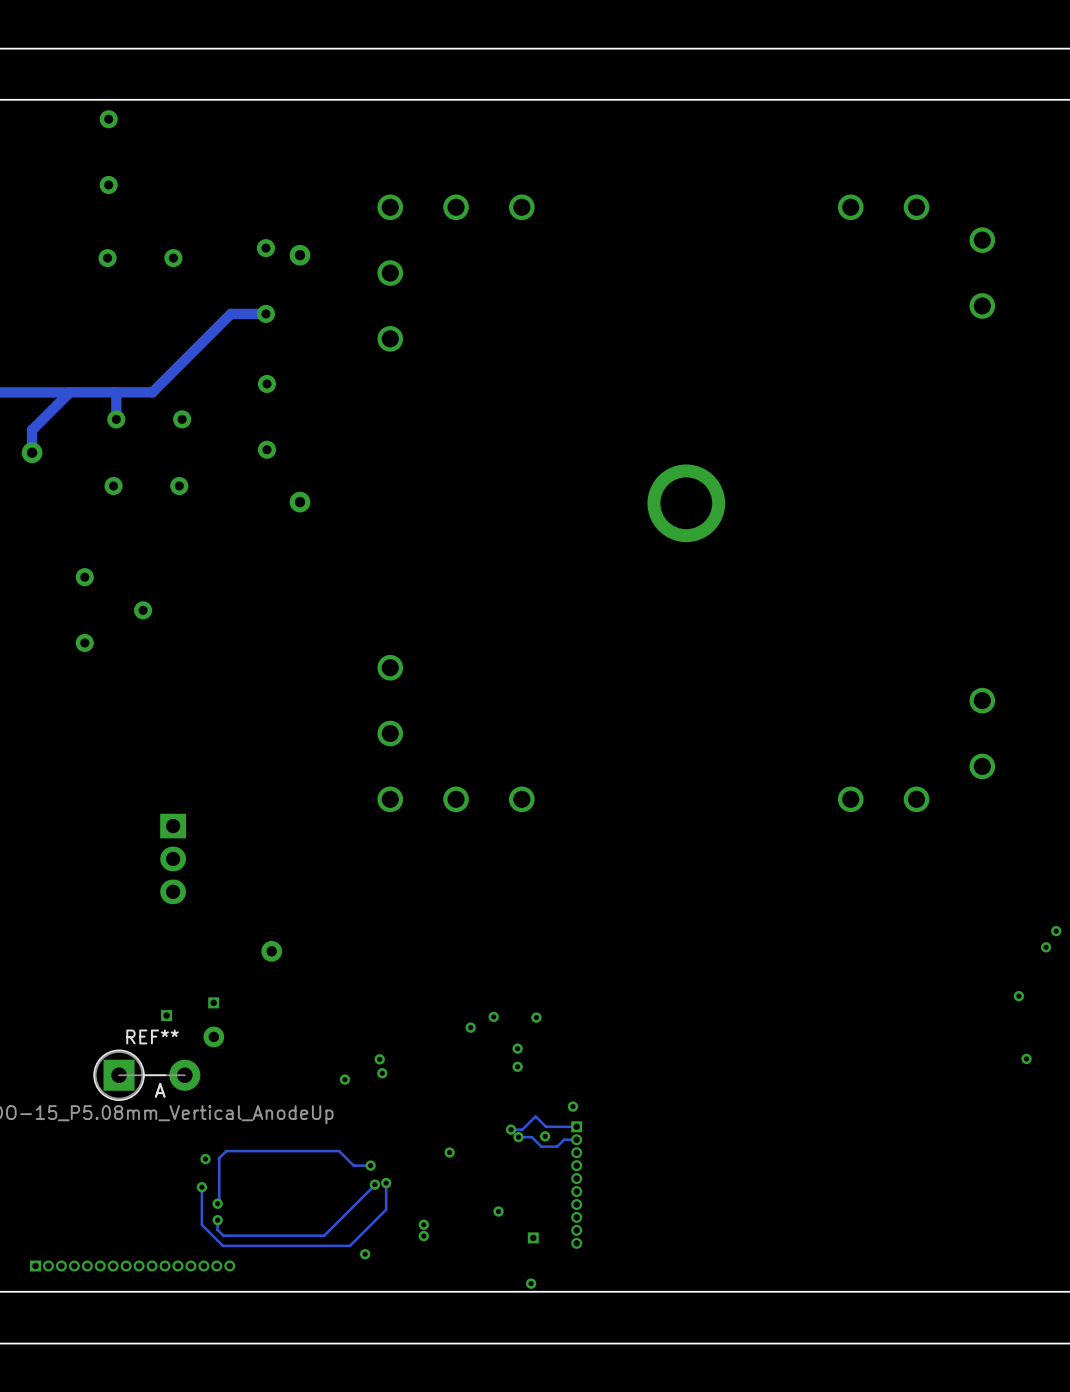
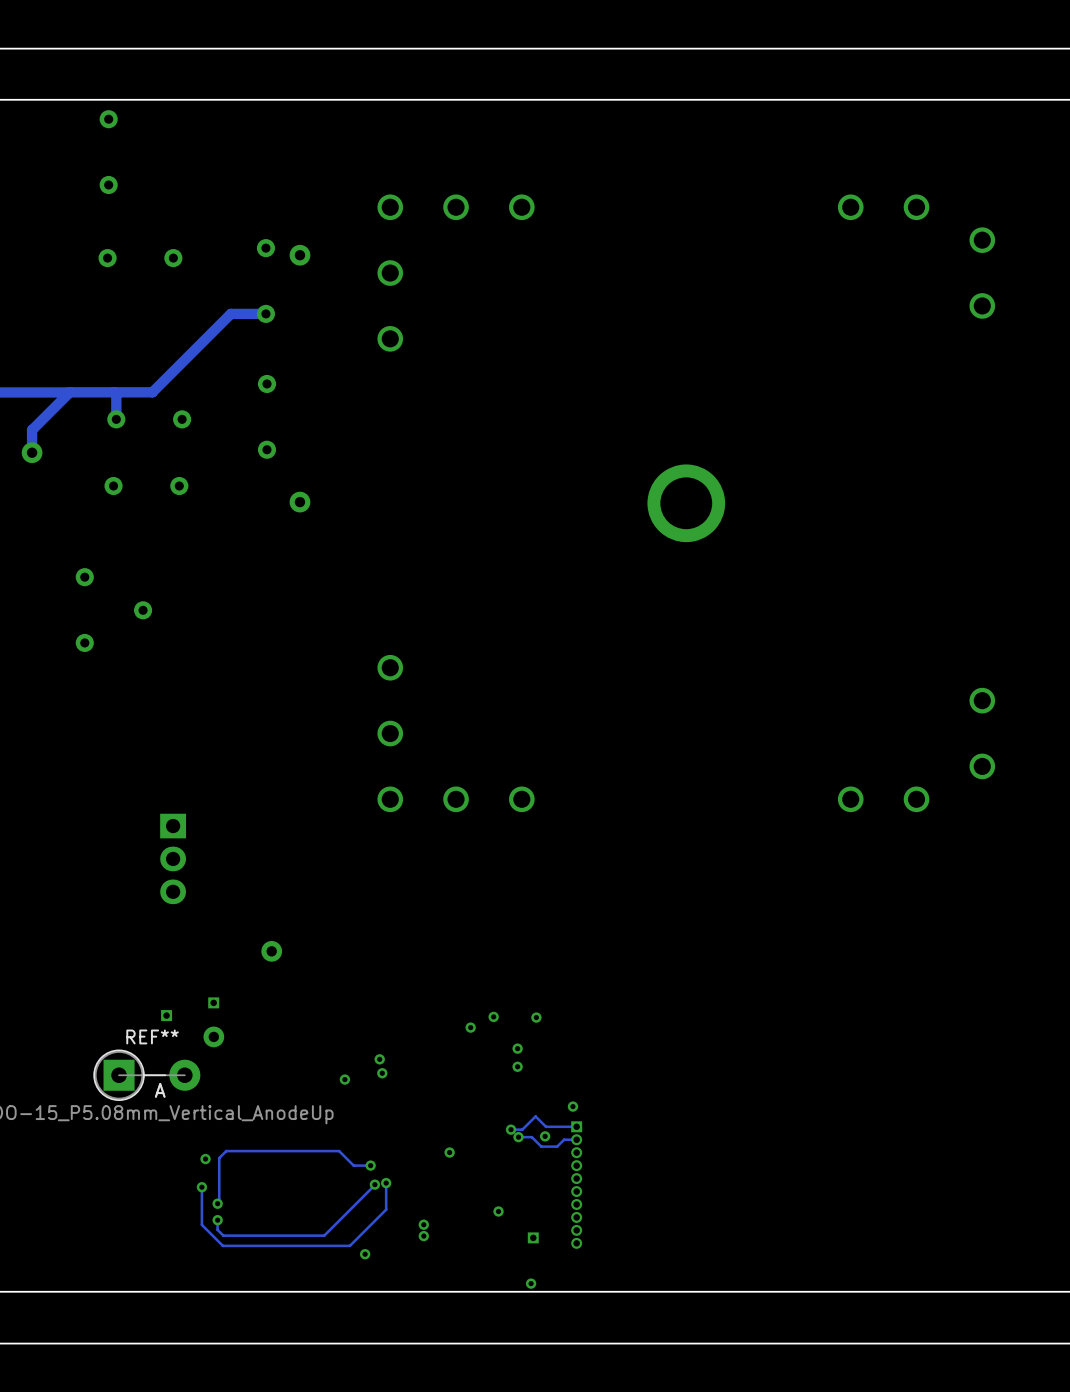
via: (1056, 931) -> none
via: (1046, 947) -> none
via: (1018, 996) -> none
via: (1026, 1058) -> none
part: (132, 1266) -> none

